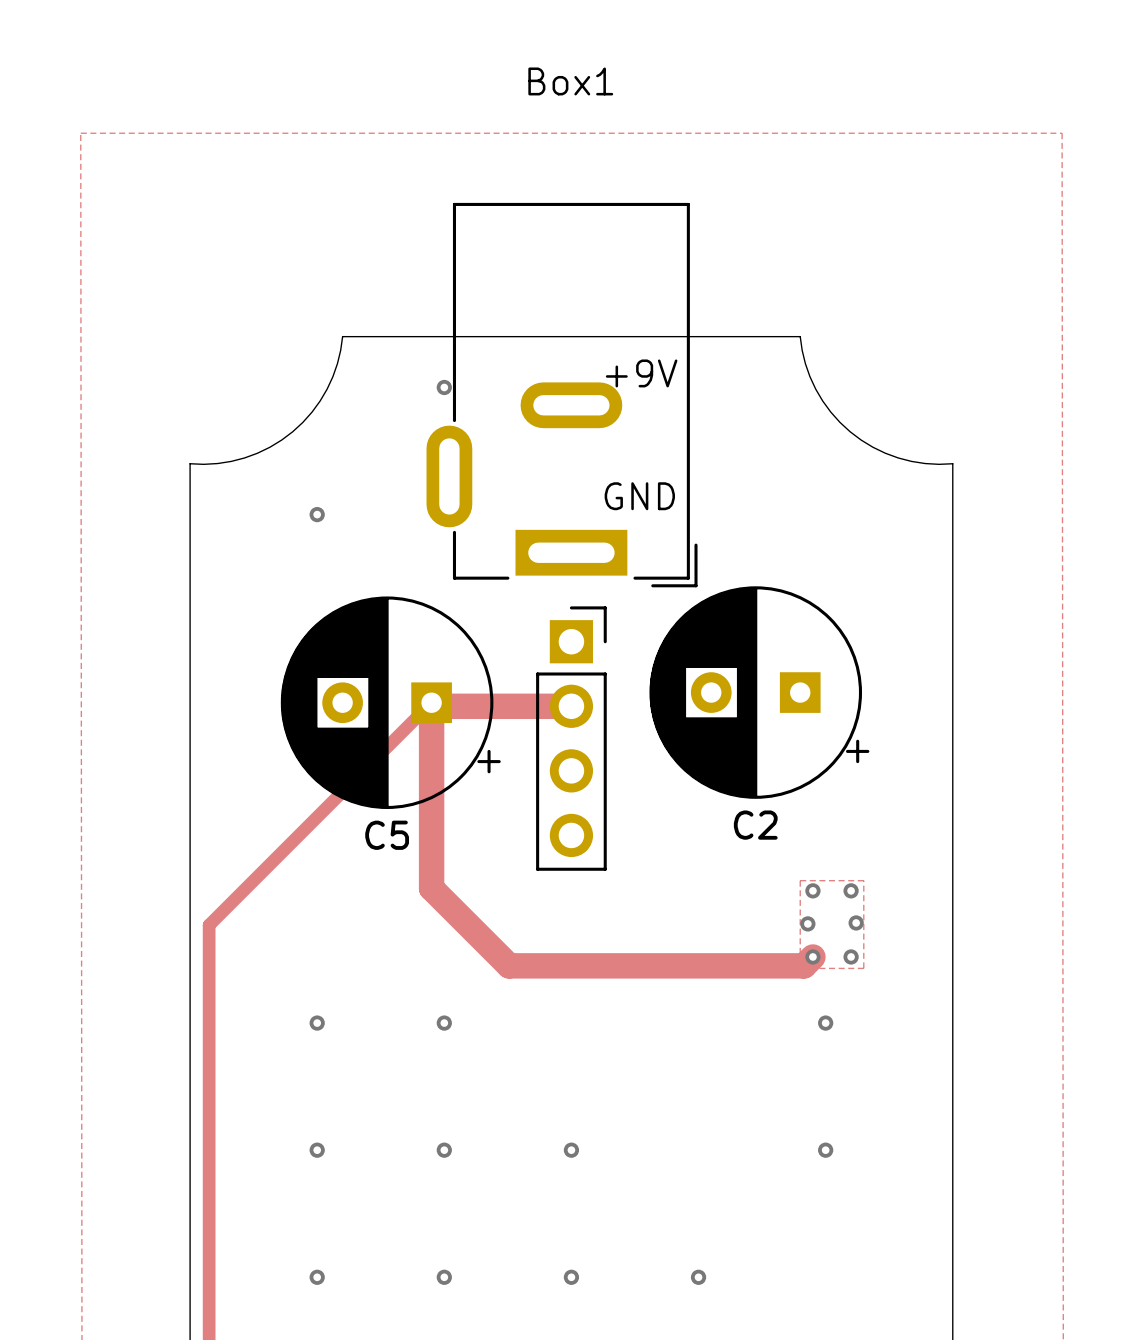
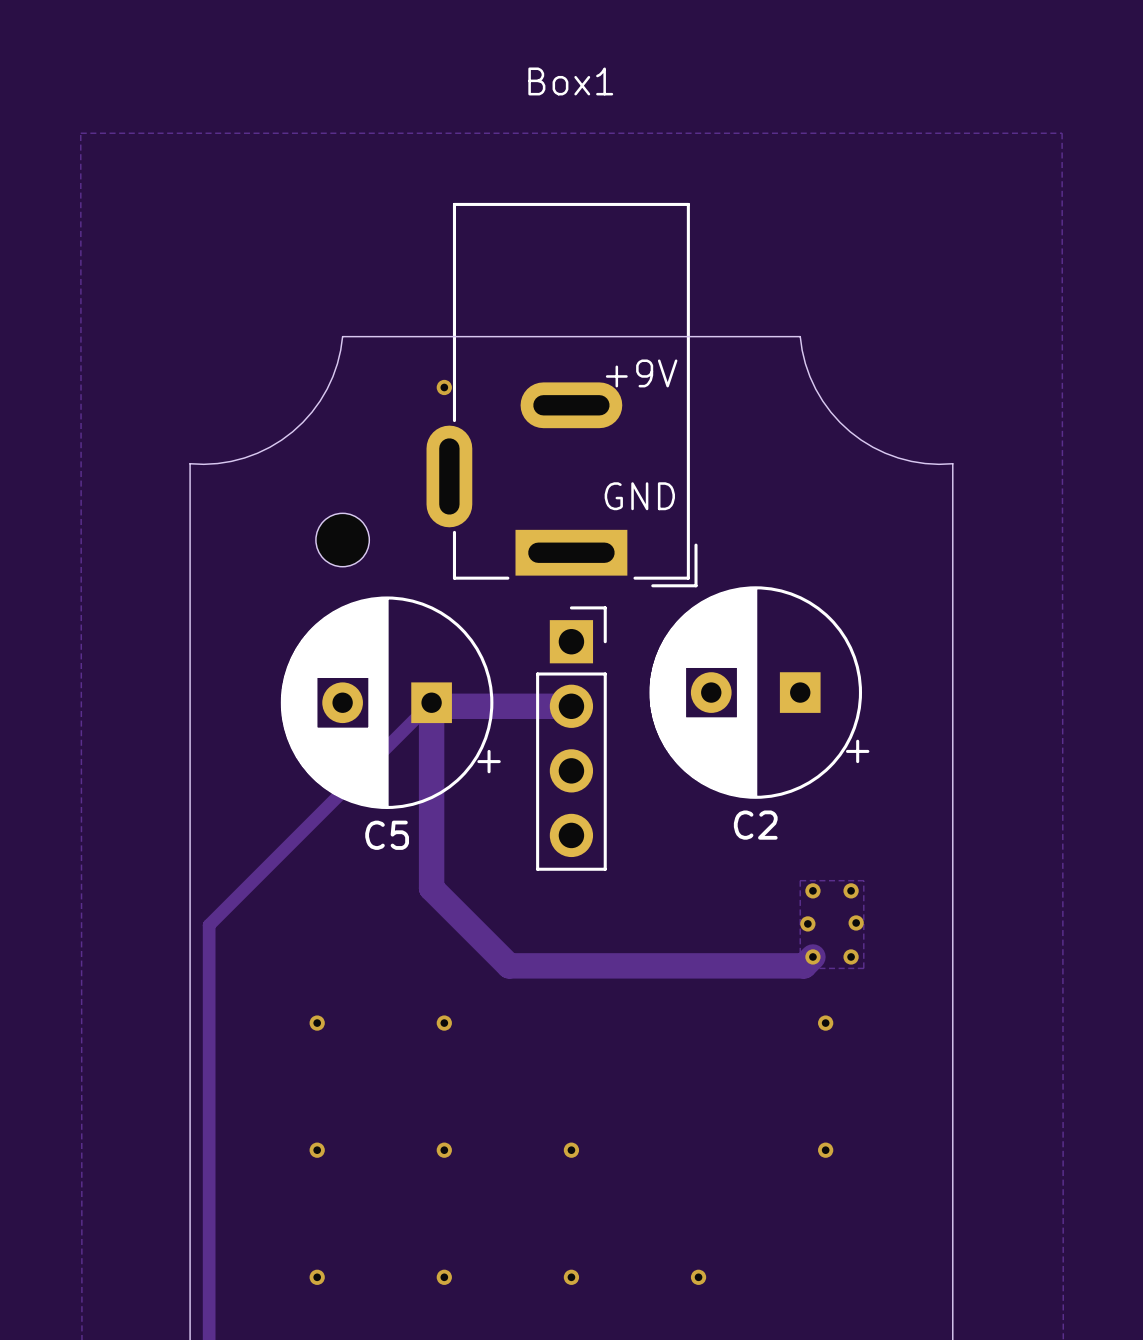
via: (317, 514) -> none
part: none -> (342, 540)

